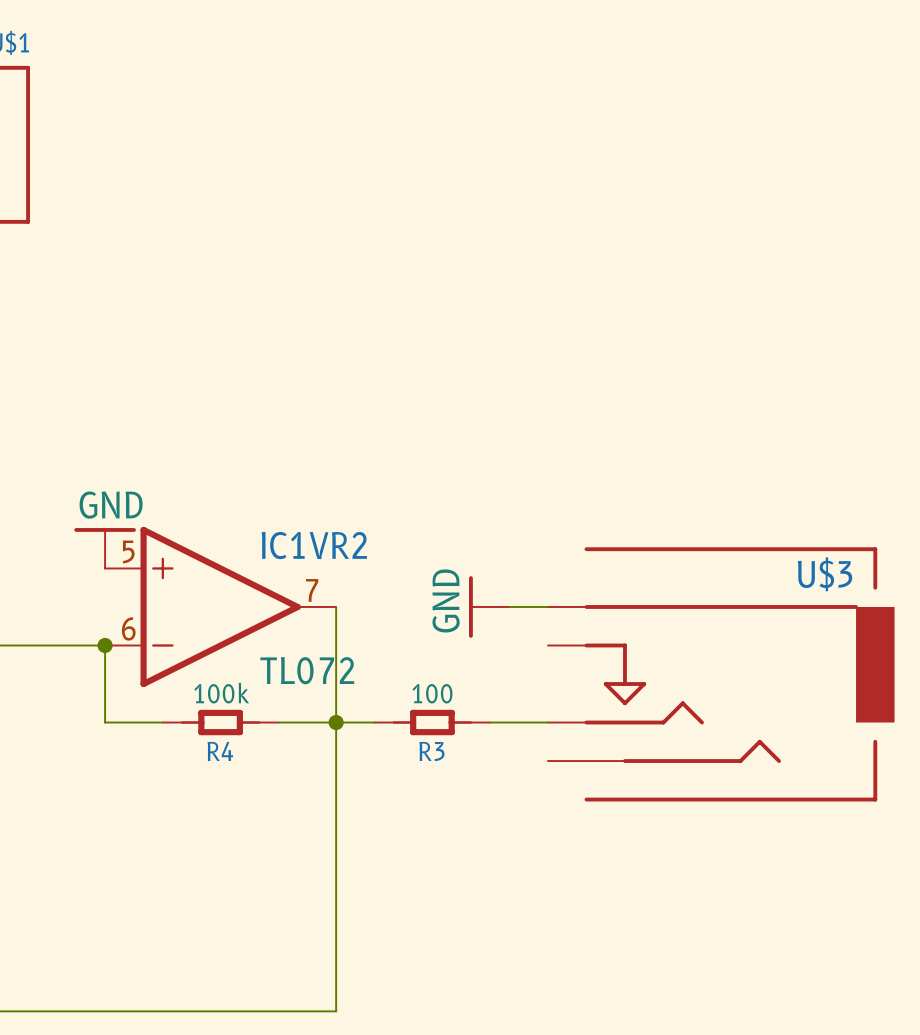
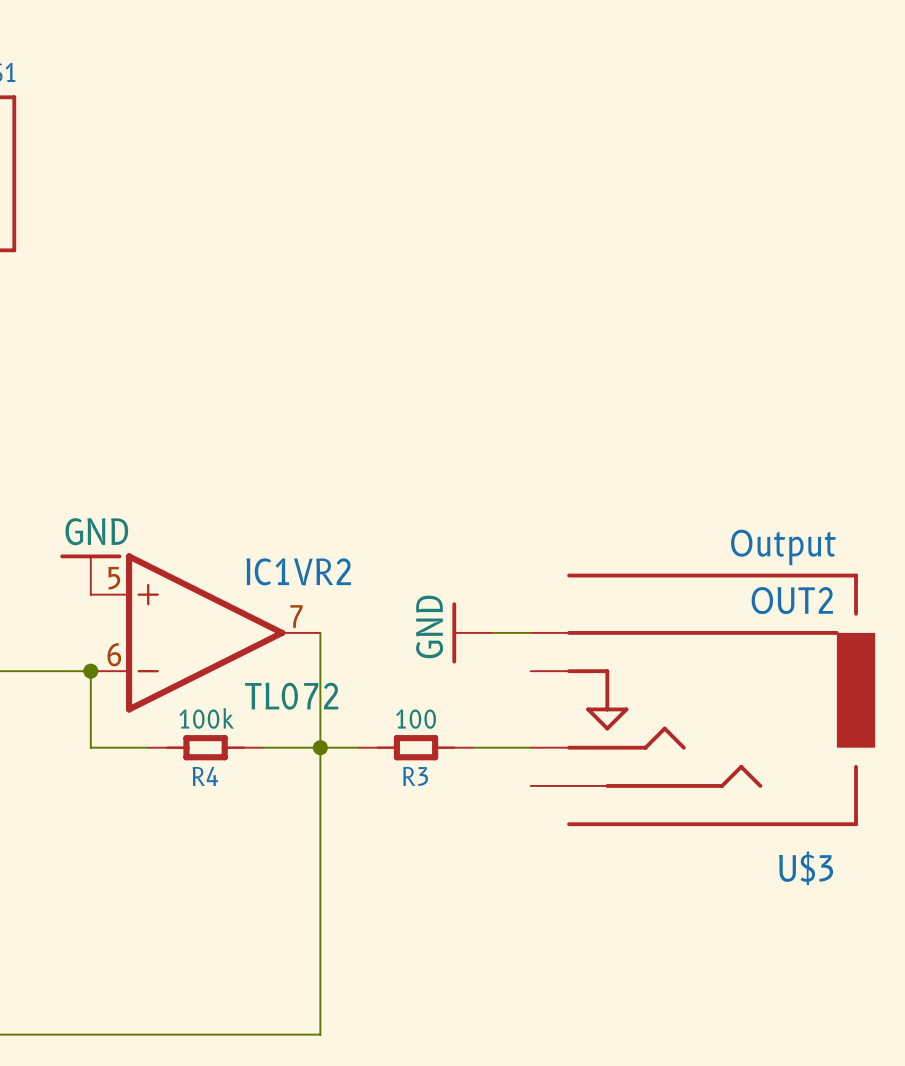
U$3 text: none -> Output (783, 547)
U$3 value: none -> OUT2 (792, 600)
U$3 name position: U$3 (824, 574) -> U$3 (806, 868)

